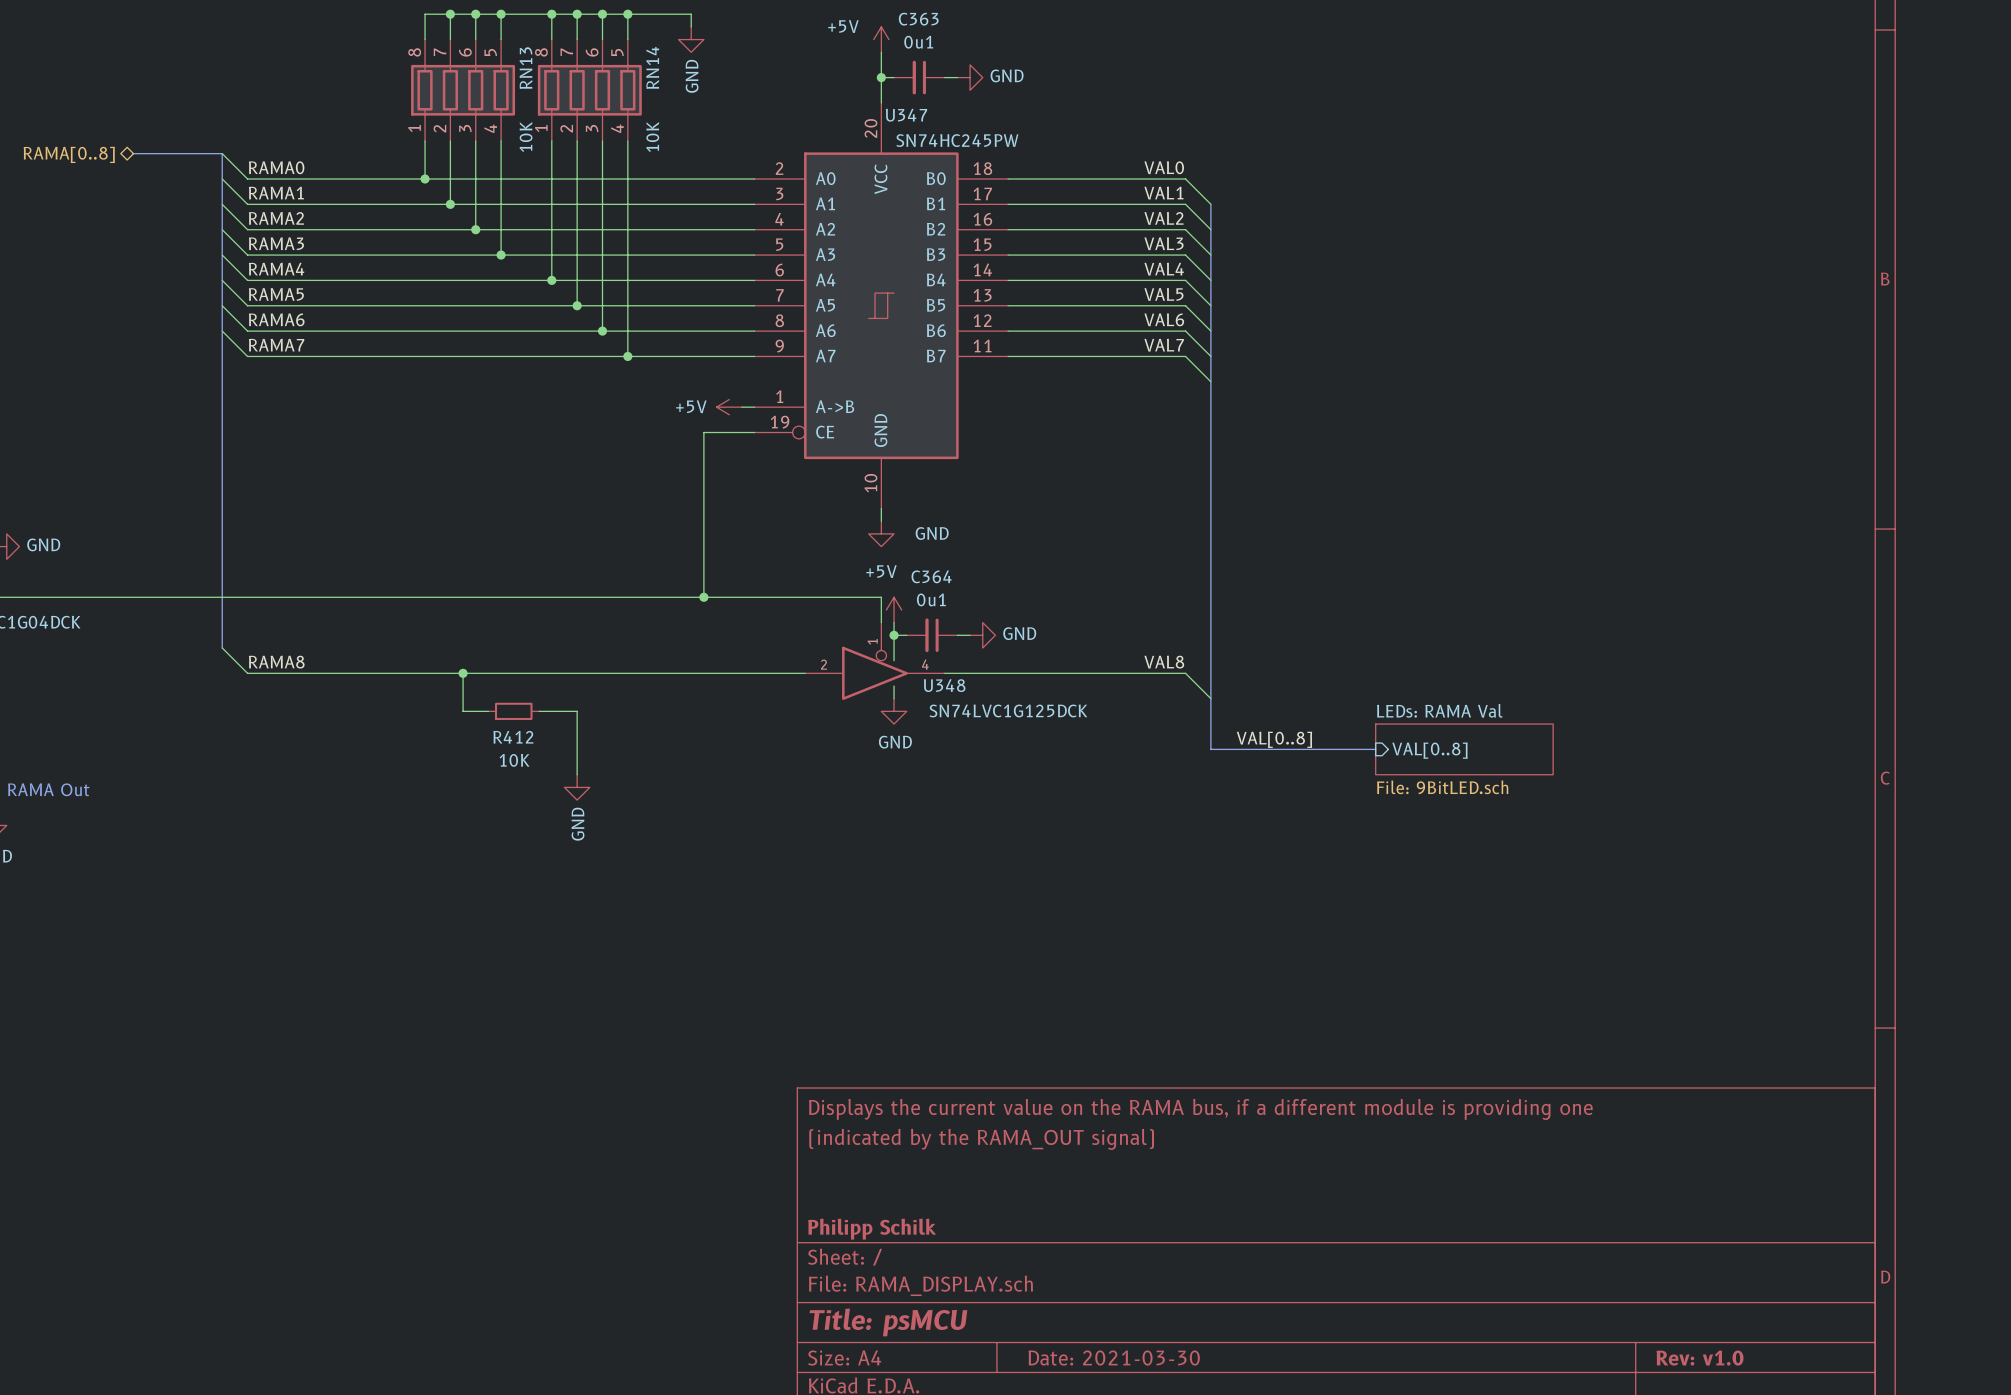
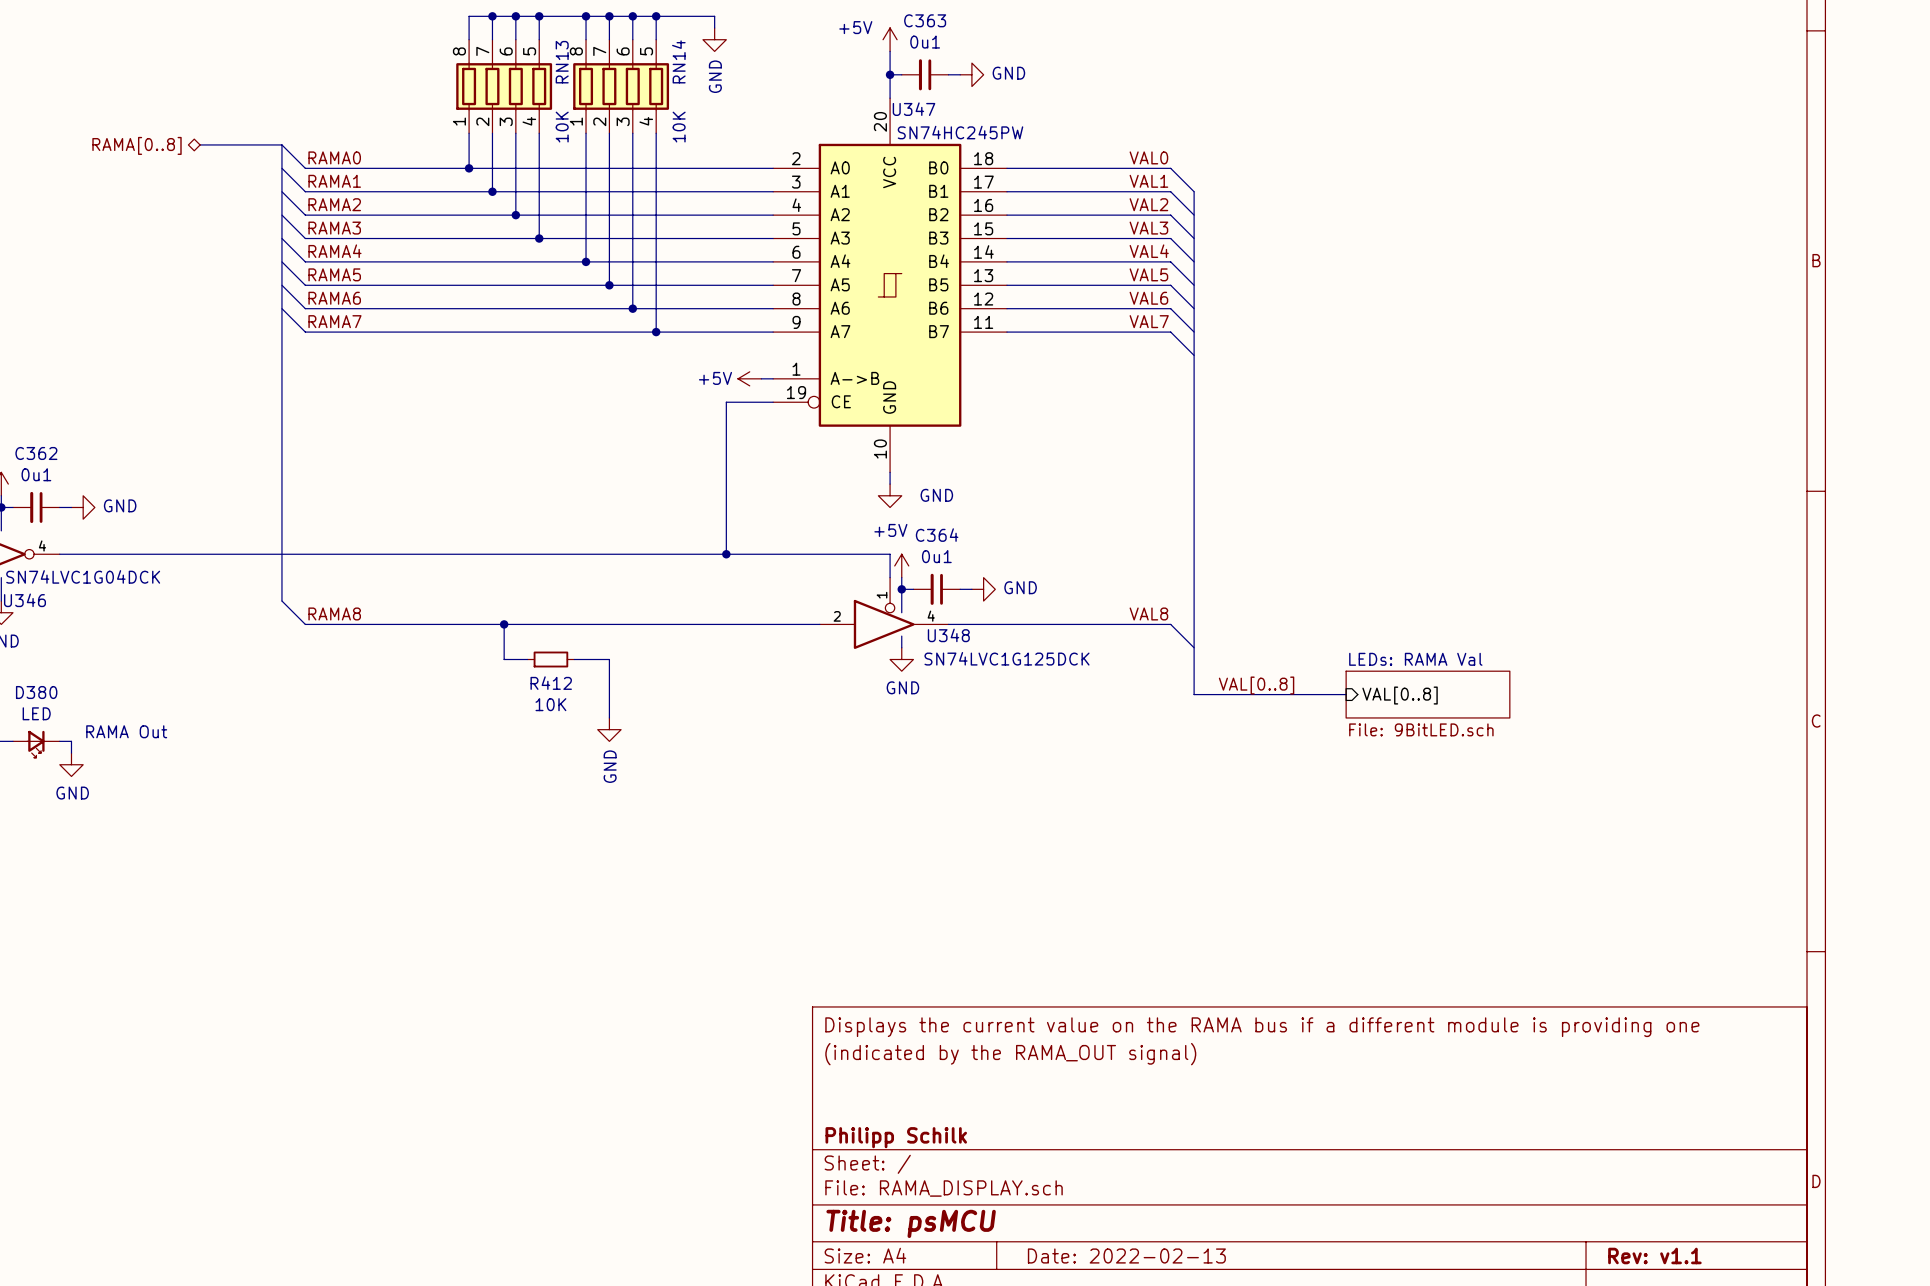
title block: Displays the current value on the RAMA bus, if a different module is providing one (1200, 1109) -> Displays the current value on the RAMA bus if a different module is providing one (1262, 1027)
title block: Date: 2021-03-30 (1114, 1358) -> Date: 2022-02-13 (1126, 1255)
title block: Rev: v1.0 (1700, 1358) -> Rev: v1.1 (1654, 1255)

